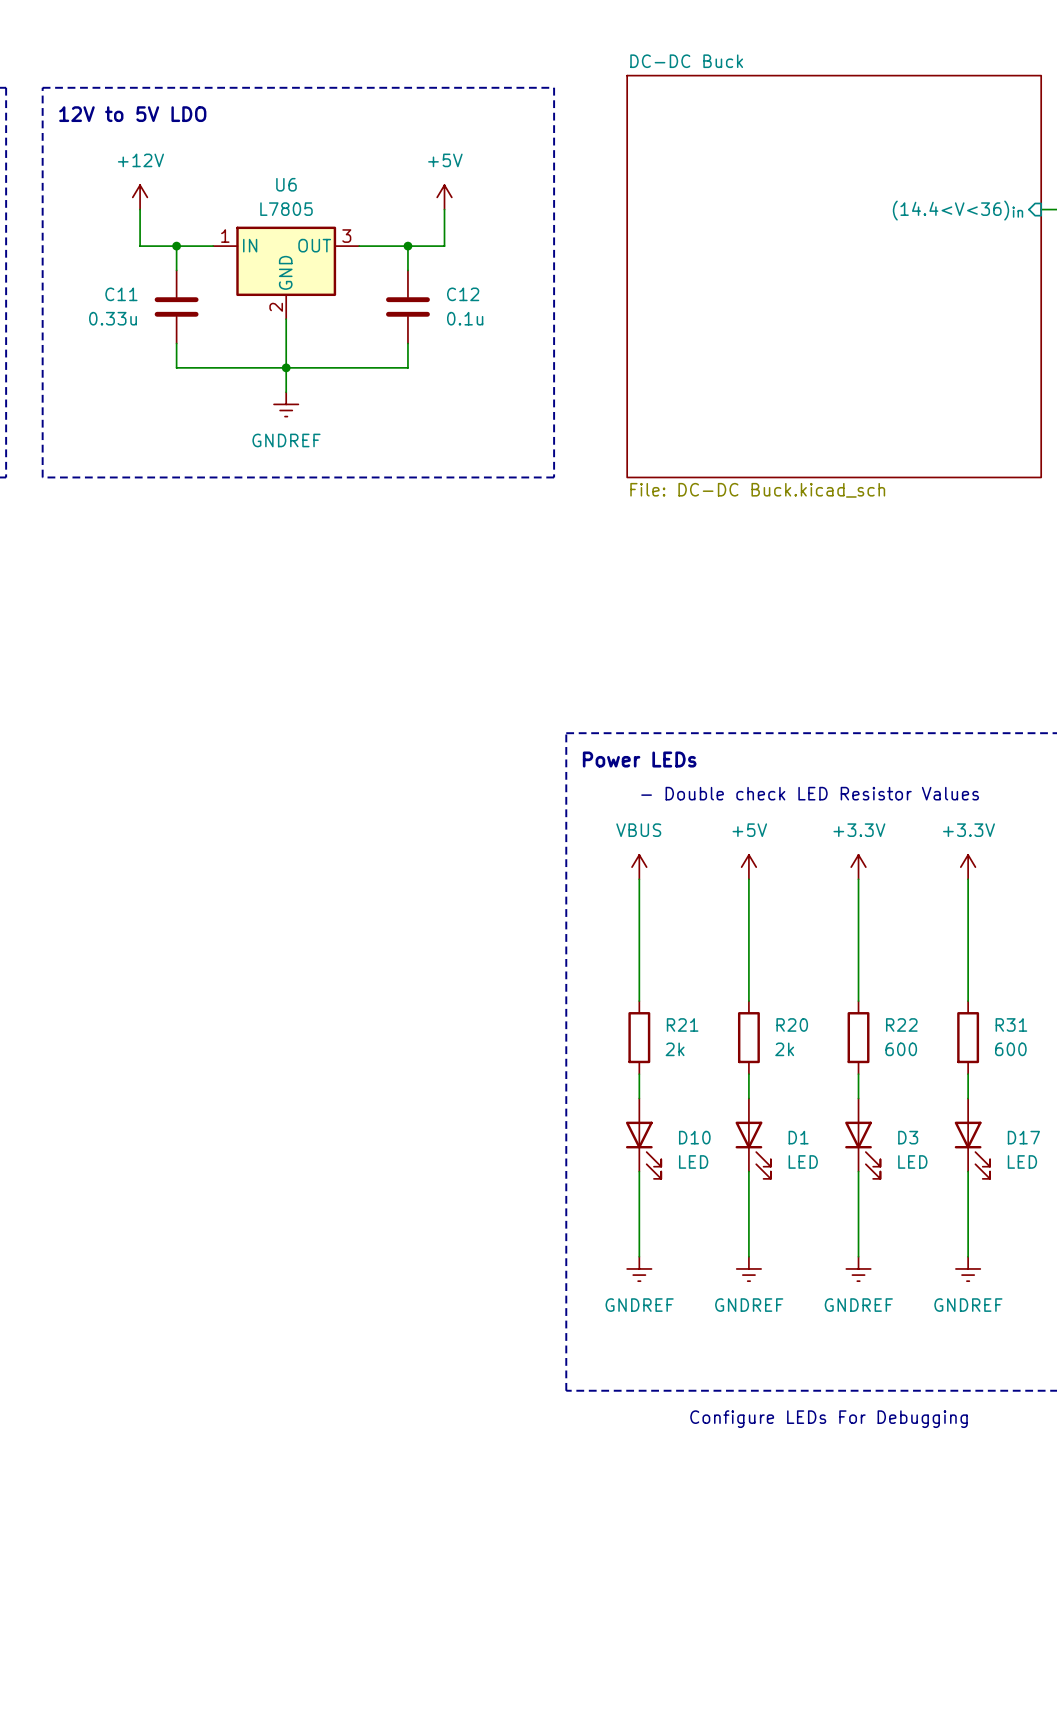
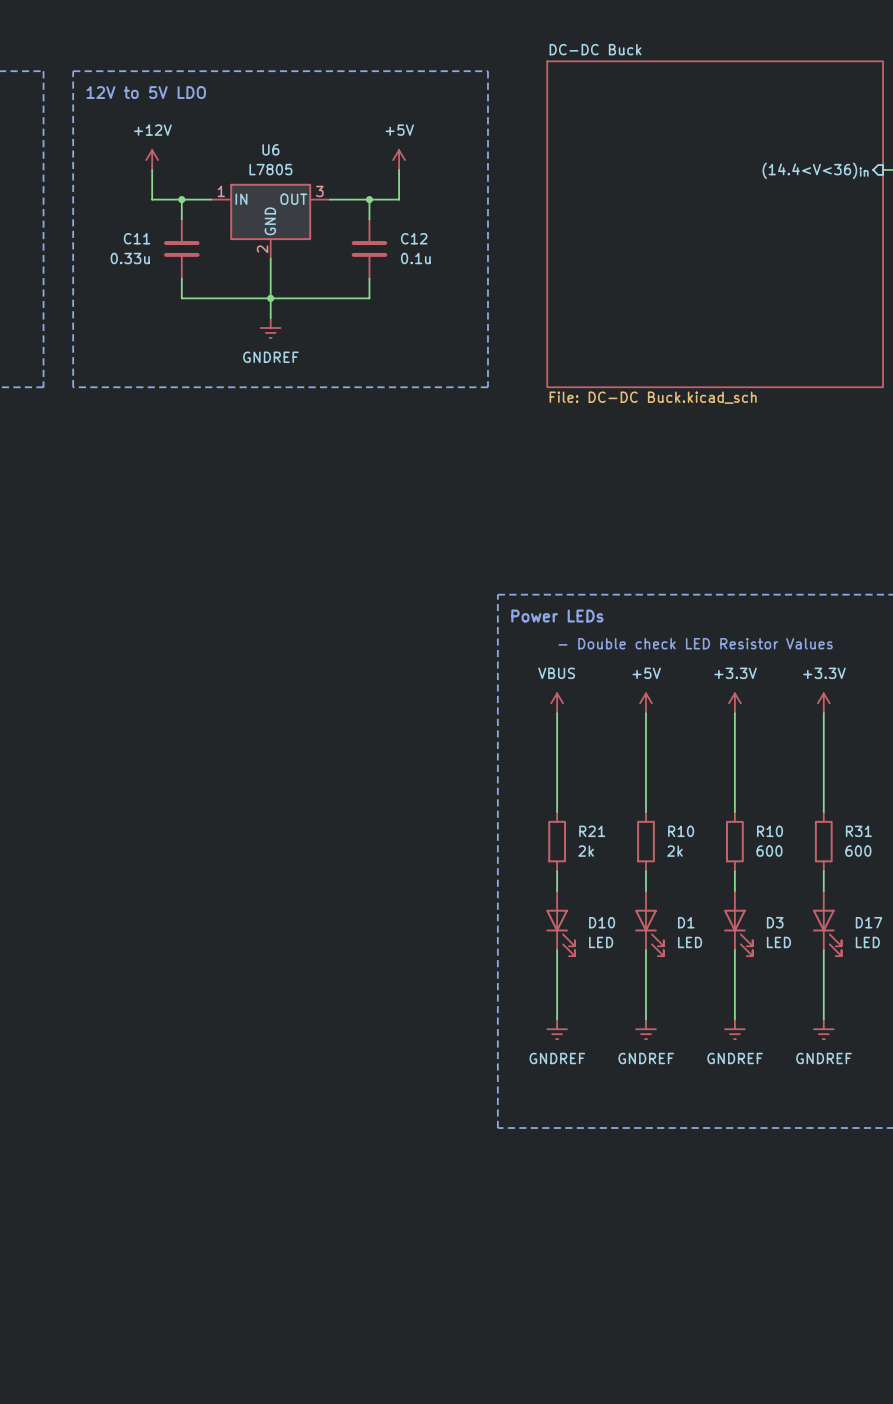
R20 name: R20 (792, 1024) -> R10 (681, 831)
R22 name: R22 (901, 1024) -> R10 (770, 831)
text: Configure LEDs For Debugging (829, 1419) -> none

